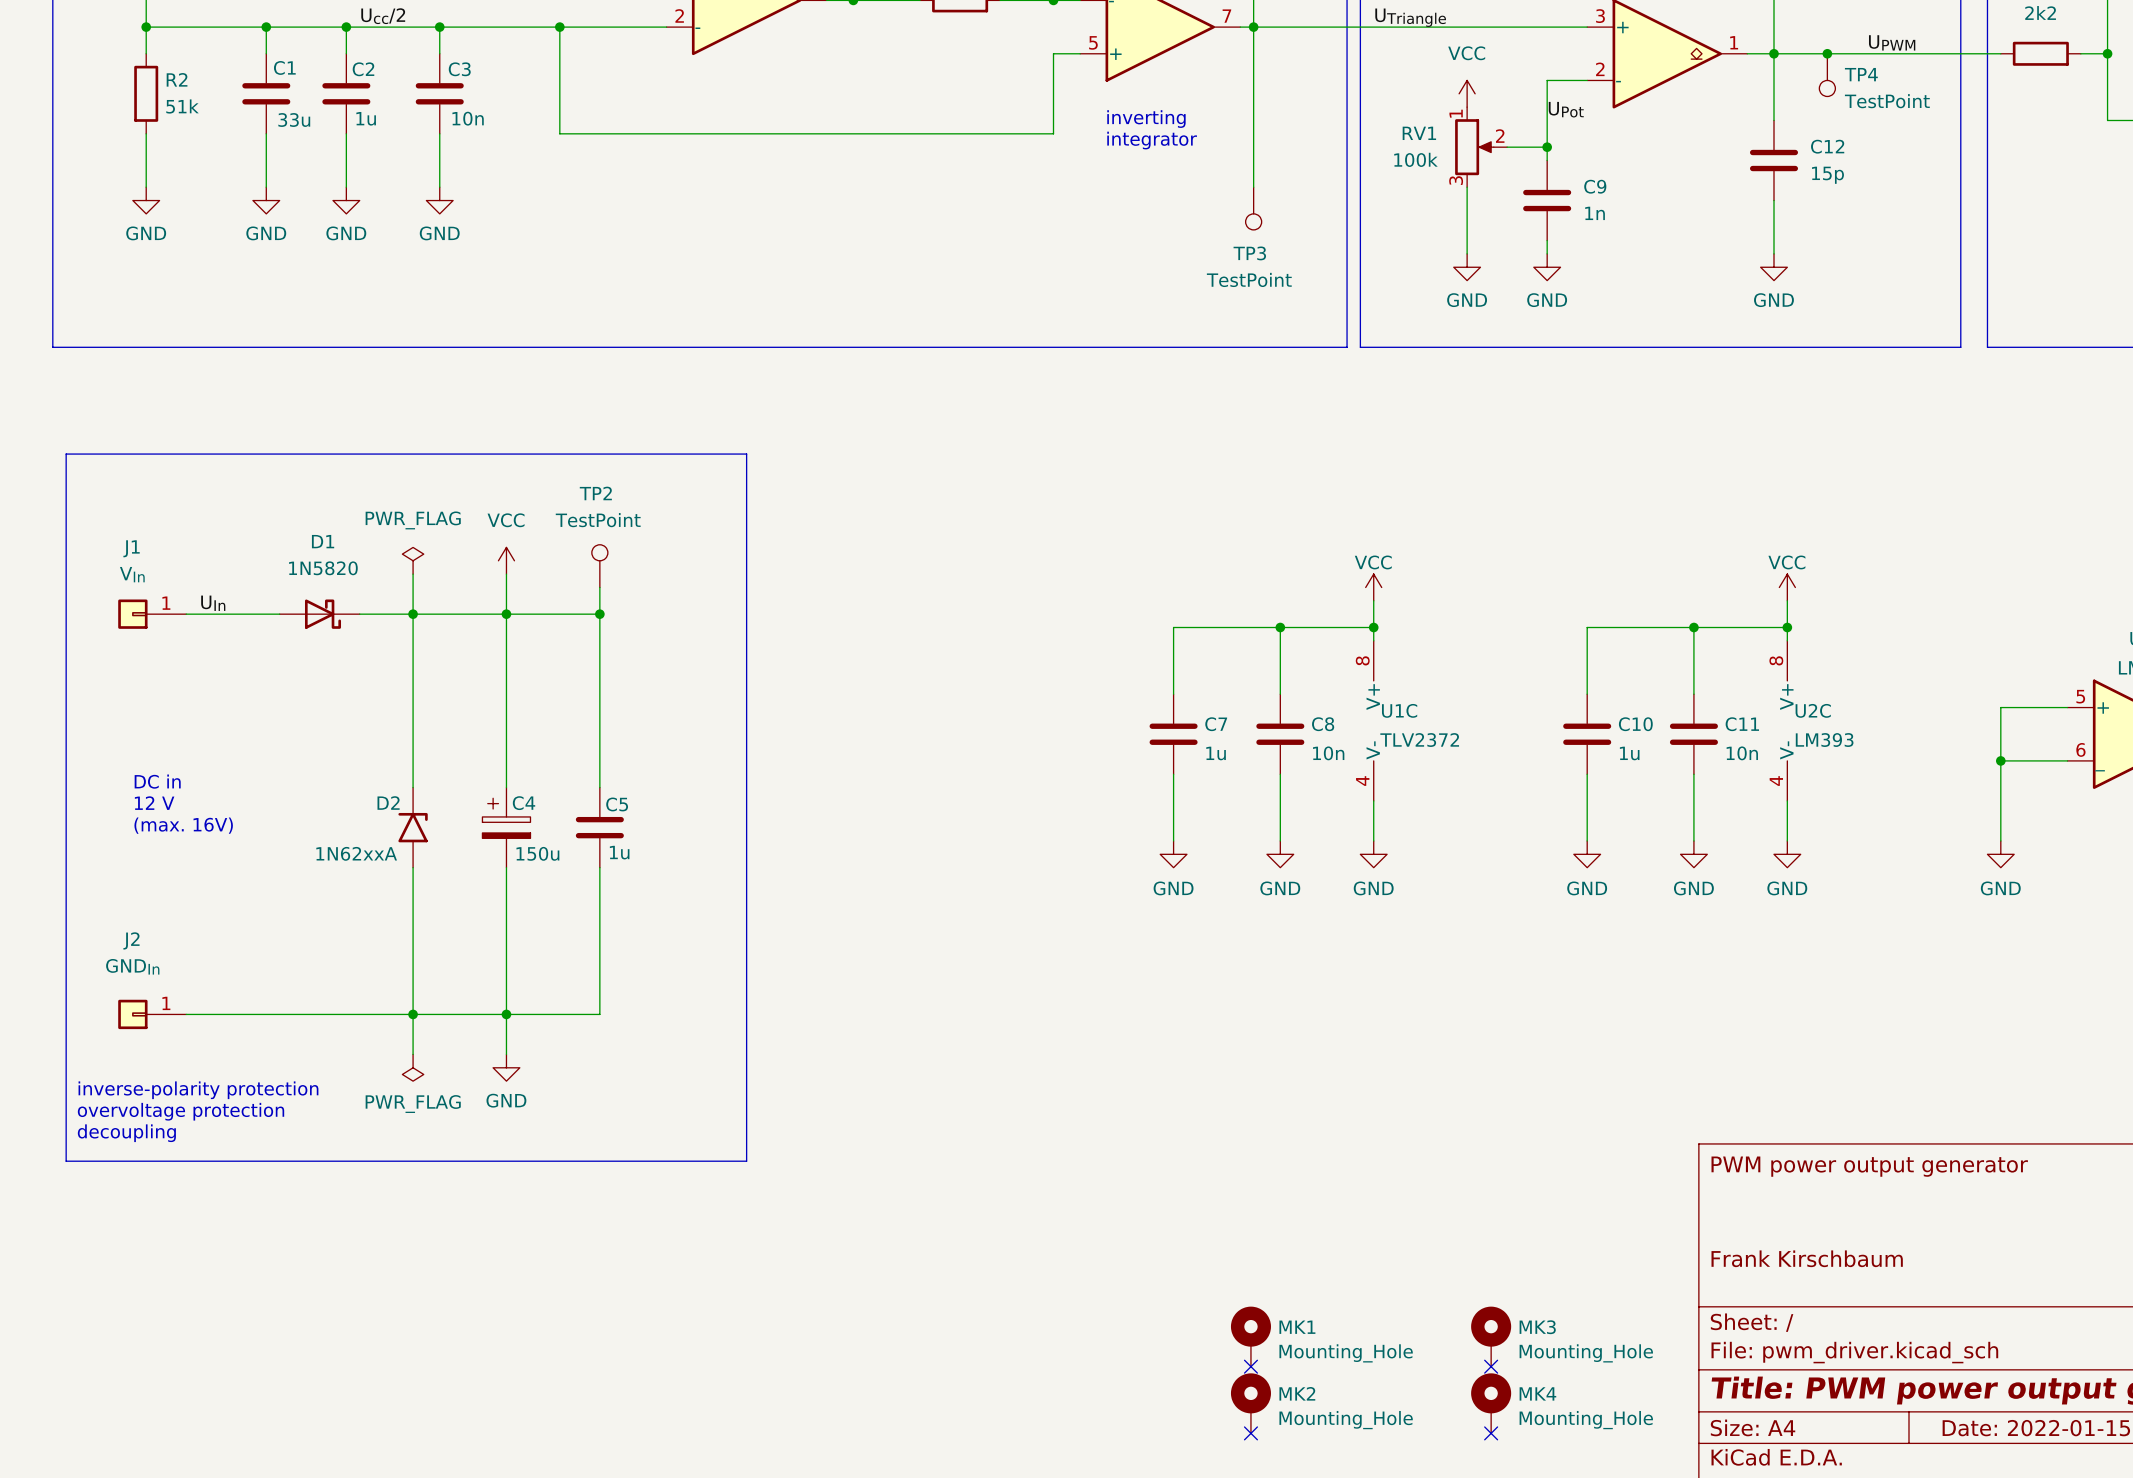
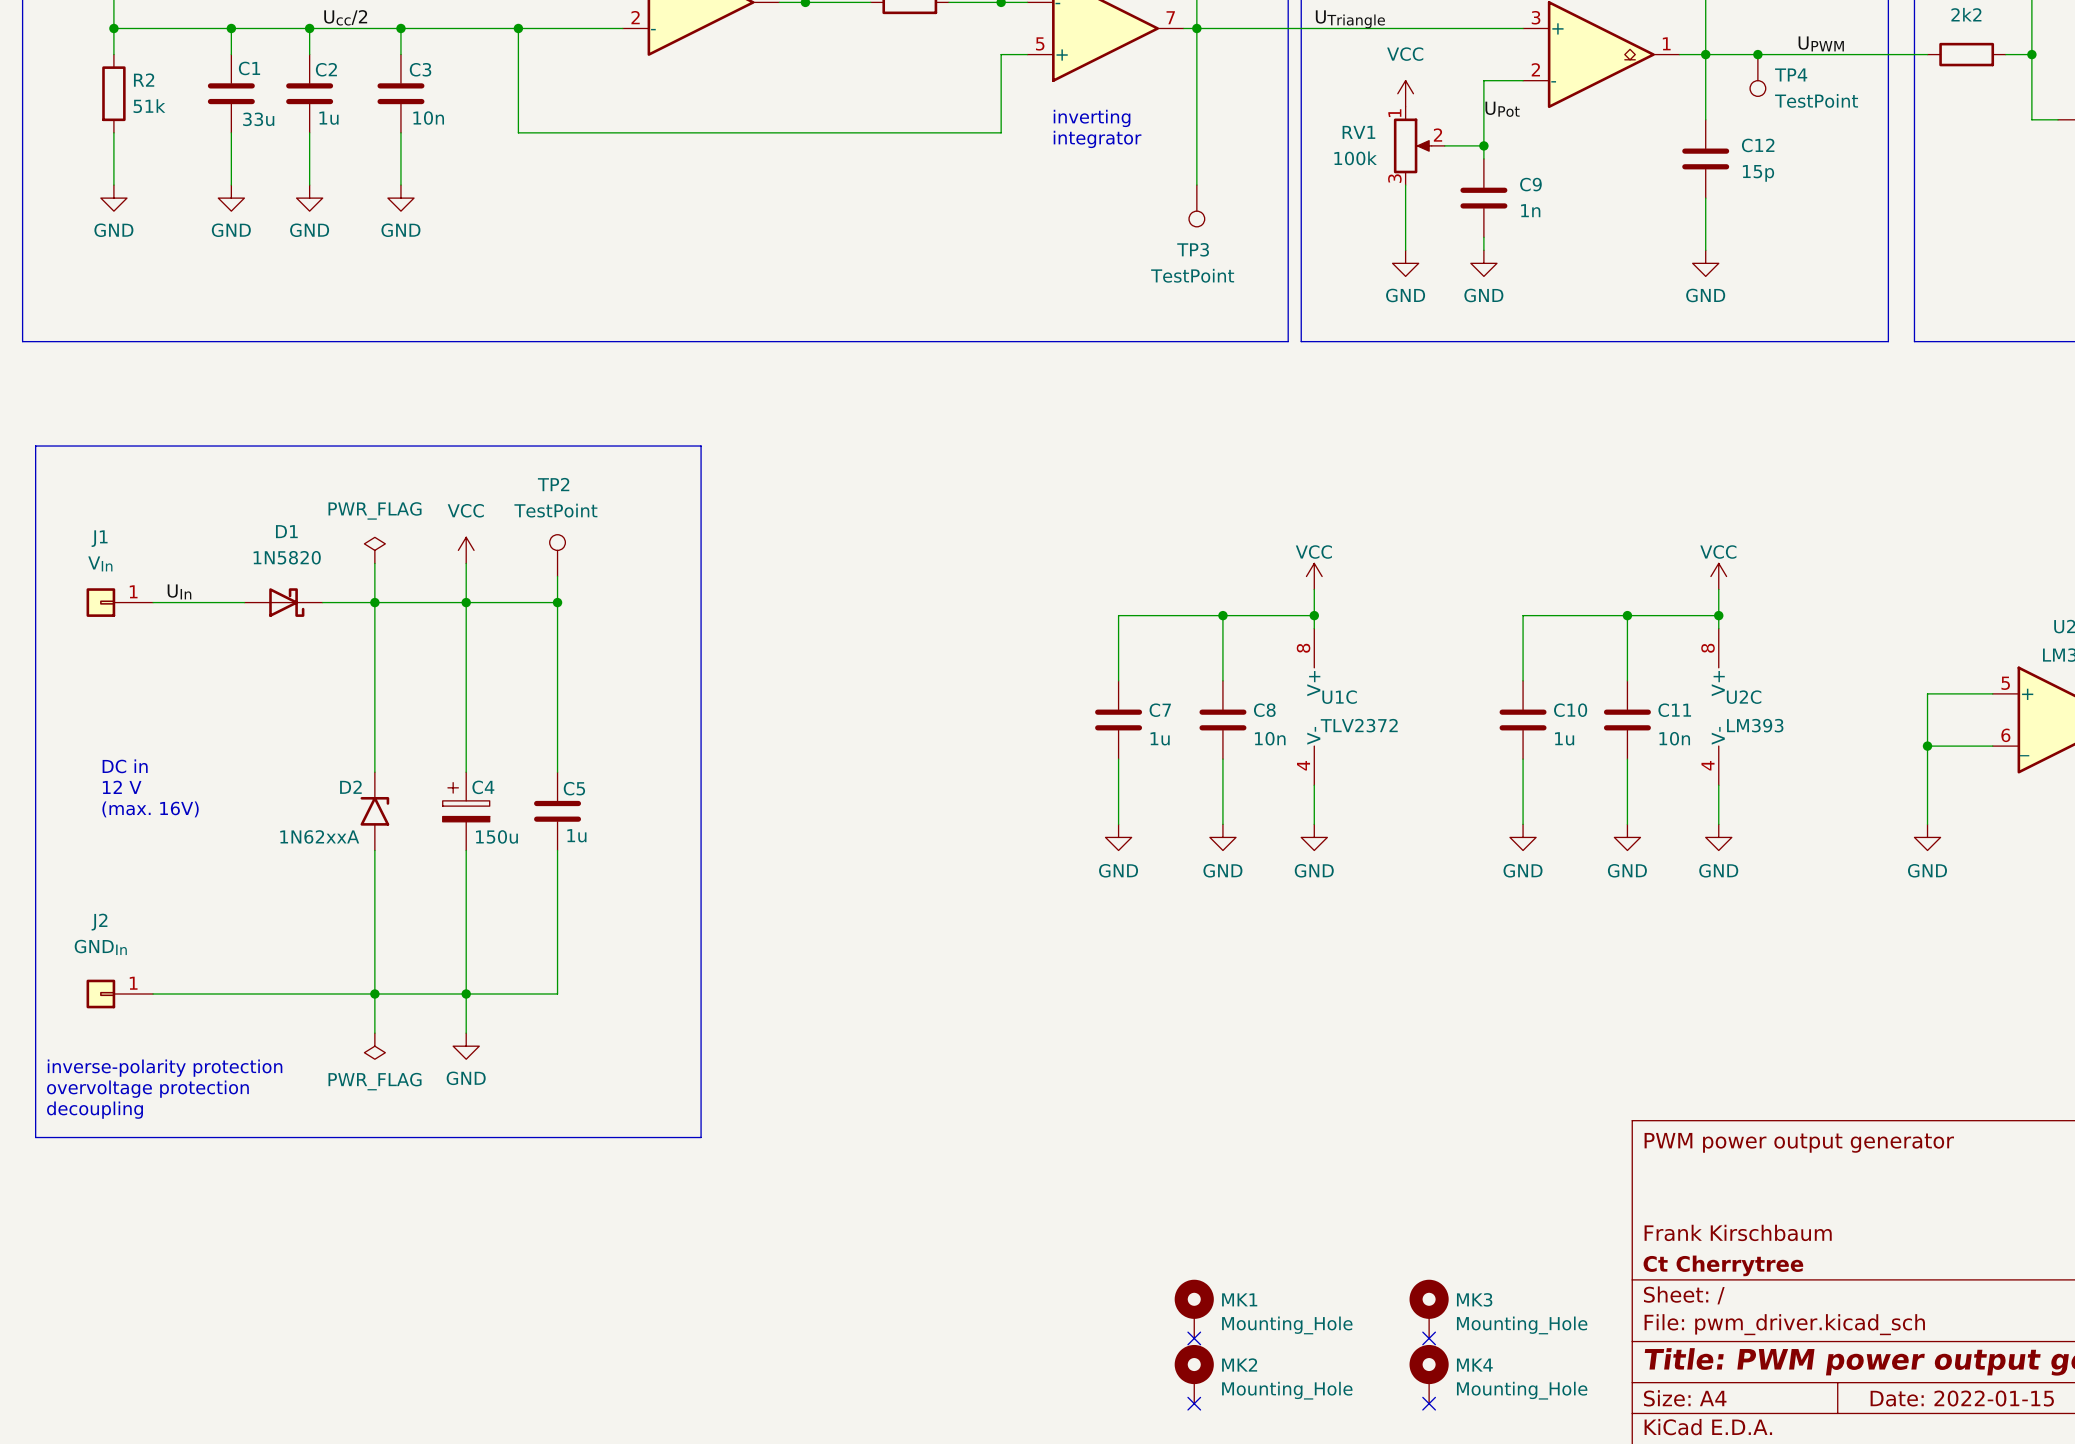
title block: none -> Ct Cherrytree (1723, 1265)

